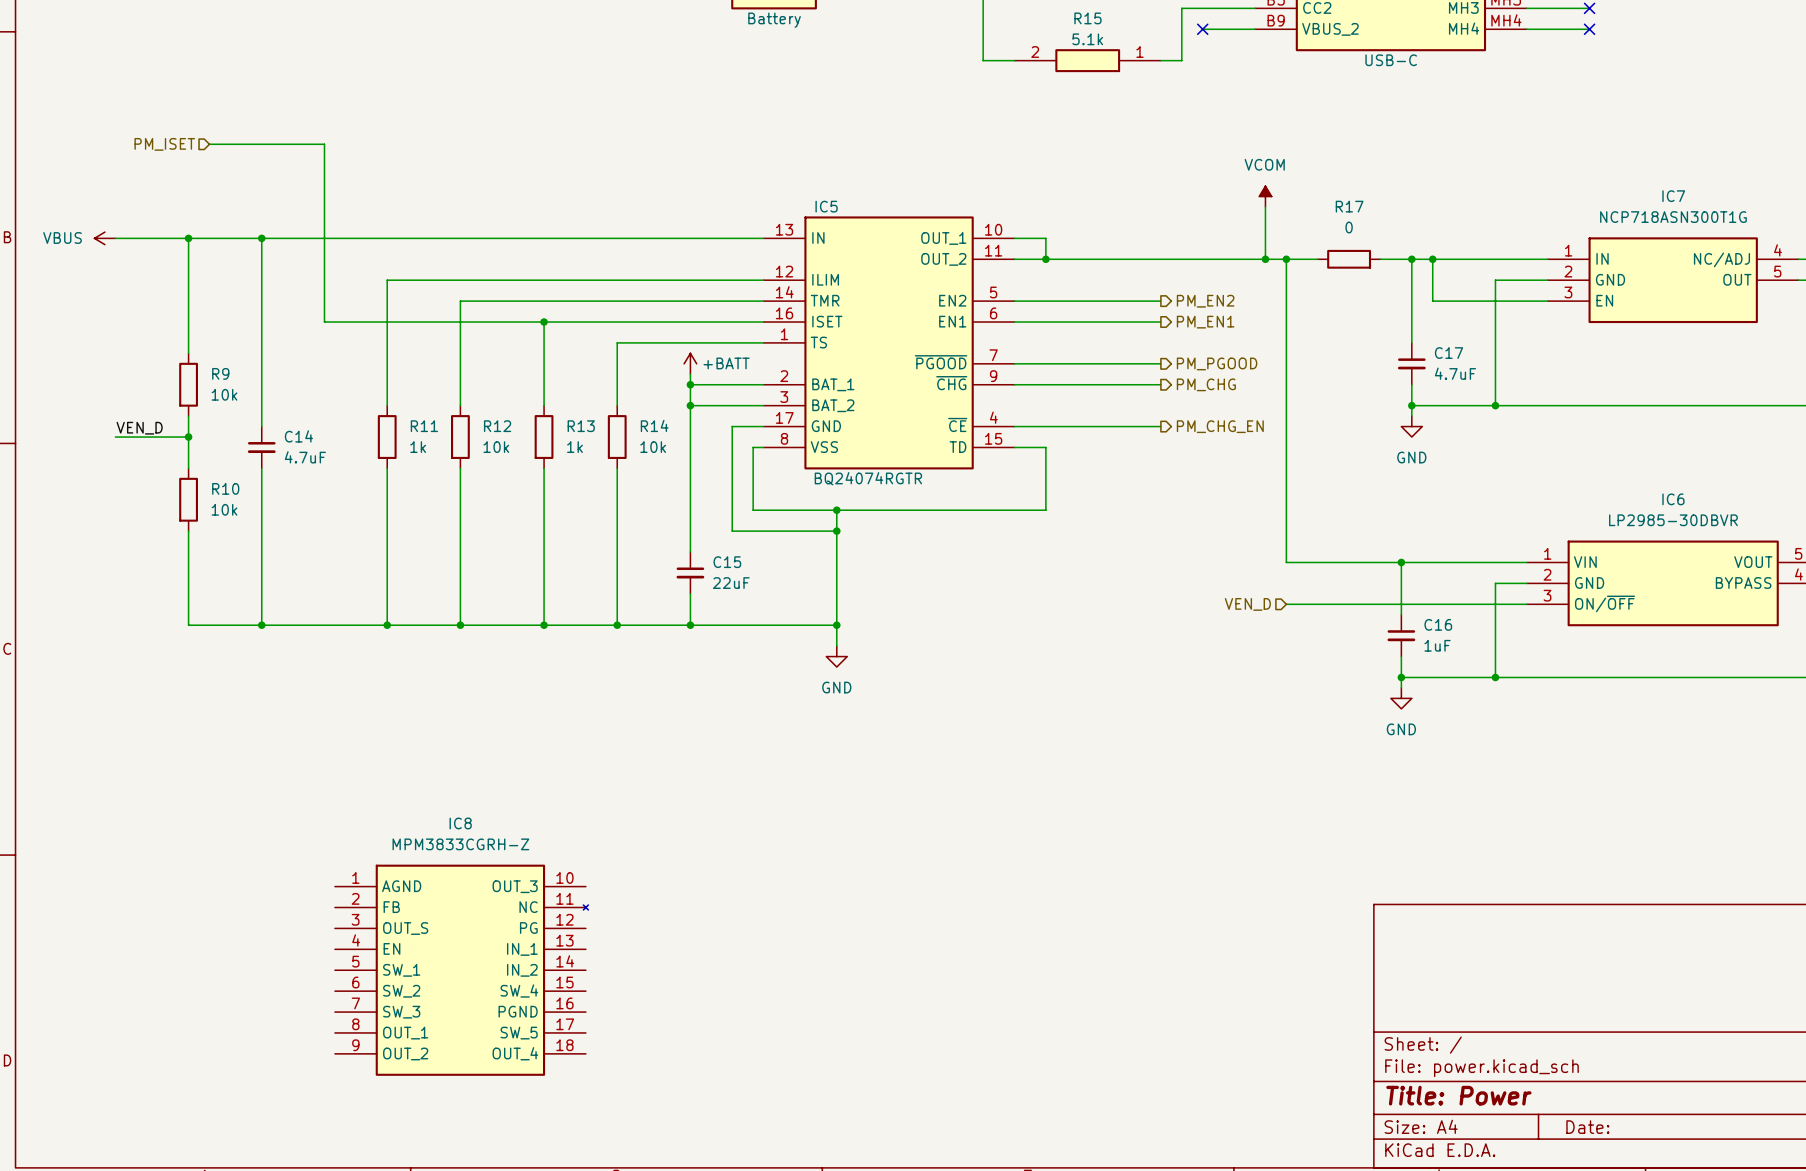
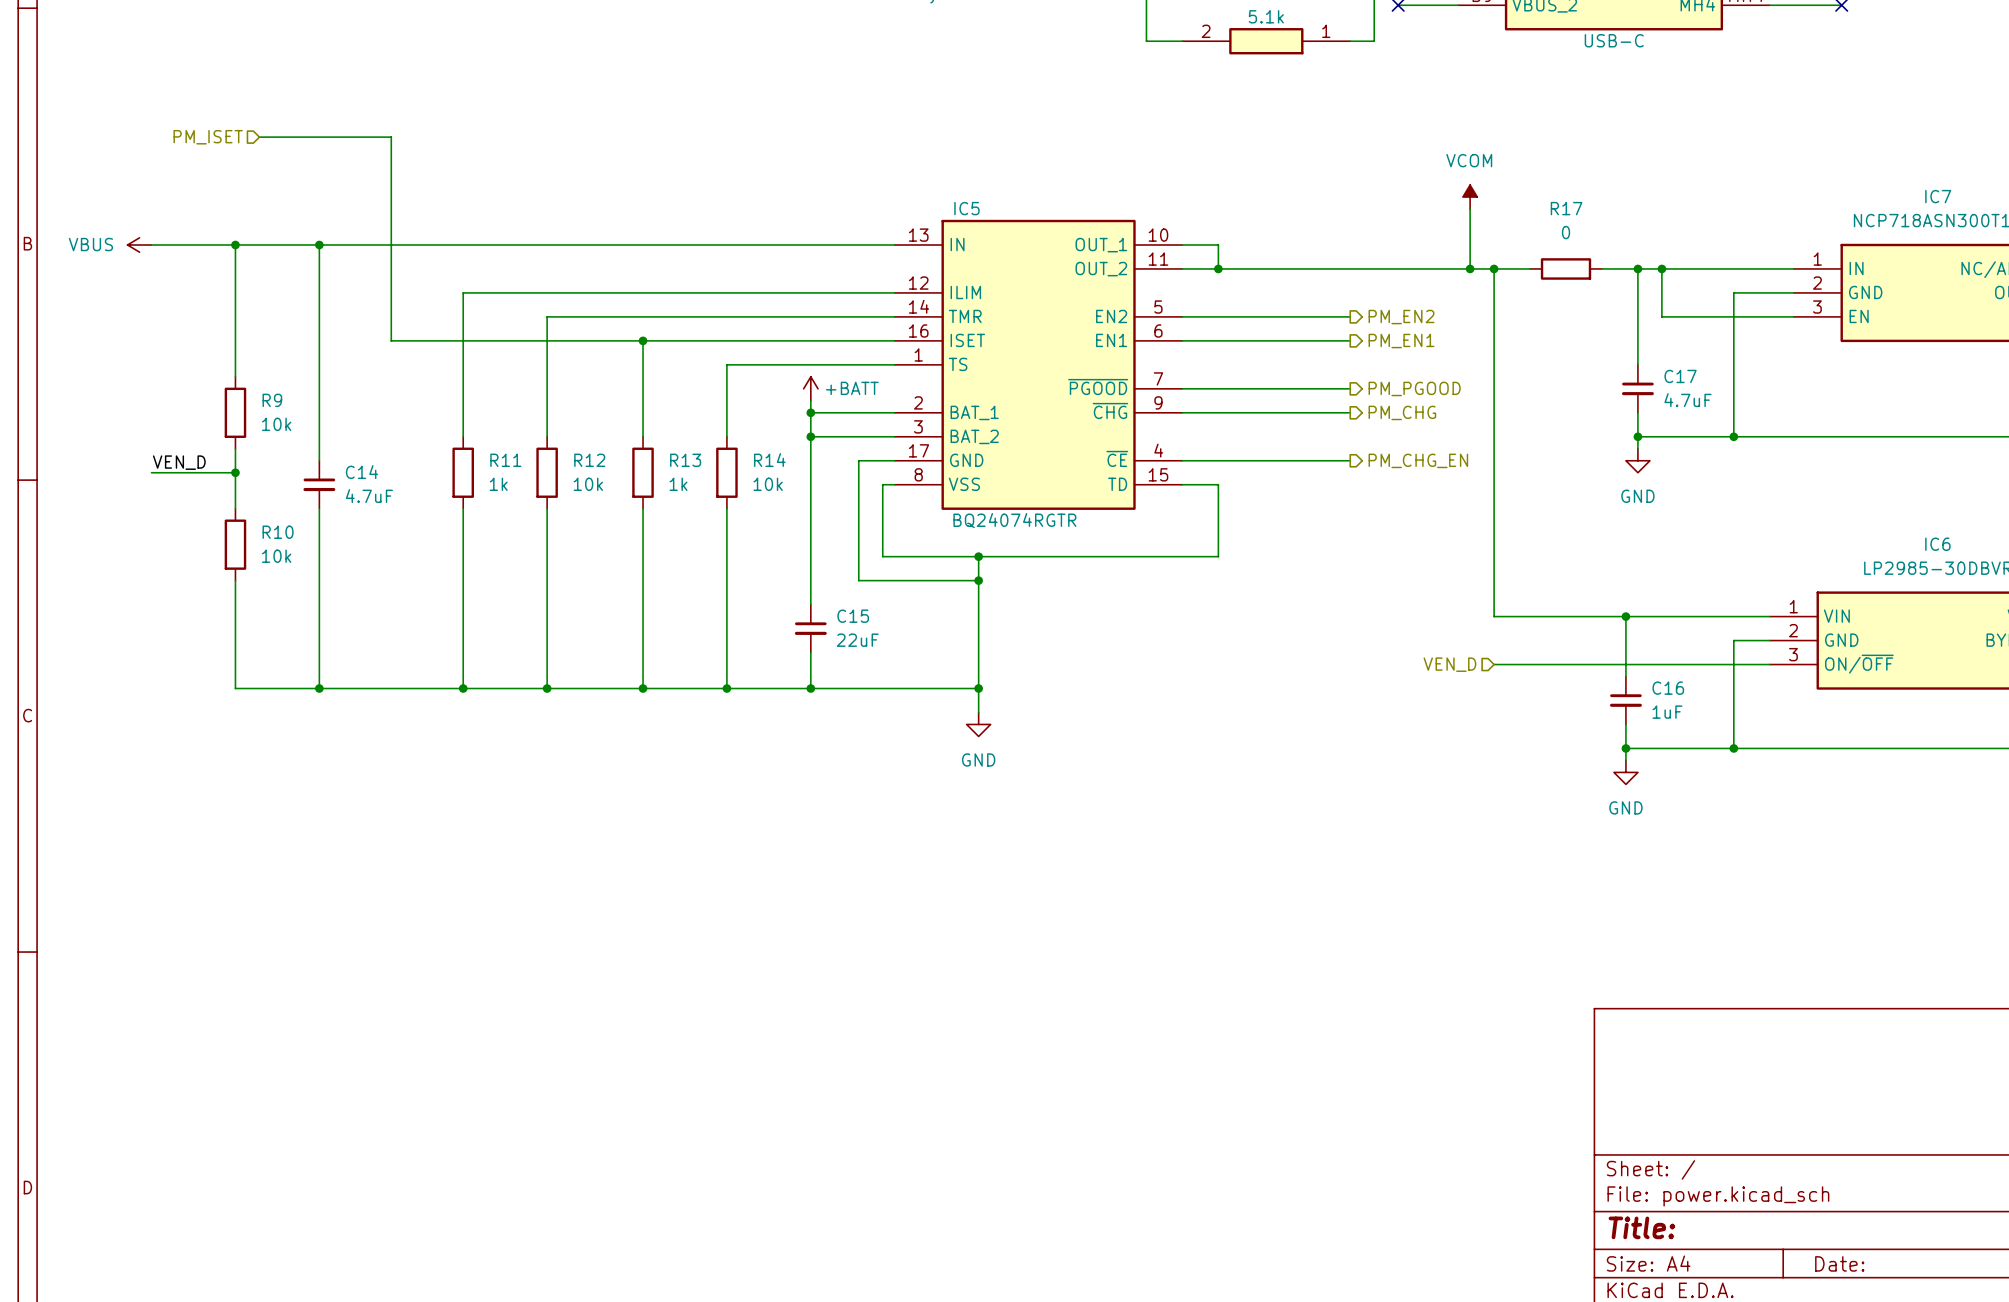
IC8: MPM3833CGRH-Z (461, 970) -> none
title block: Title: Power (1458, 1095) -> Title: (1641, 1227)

